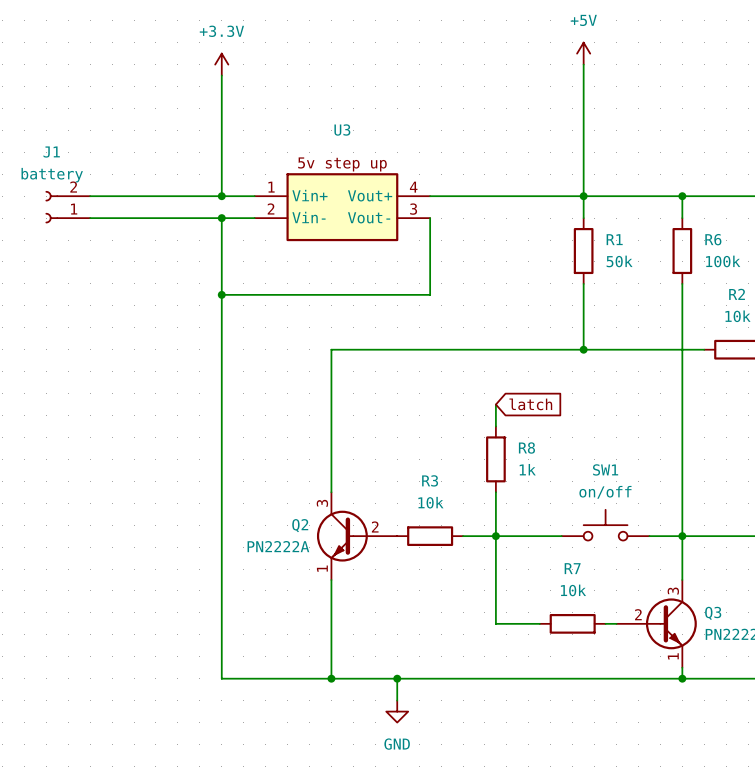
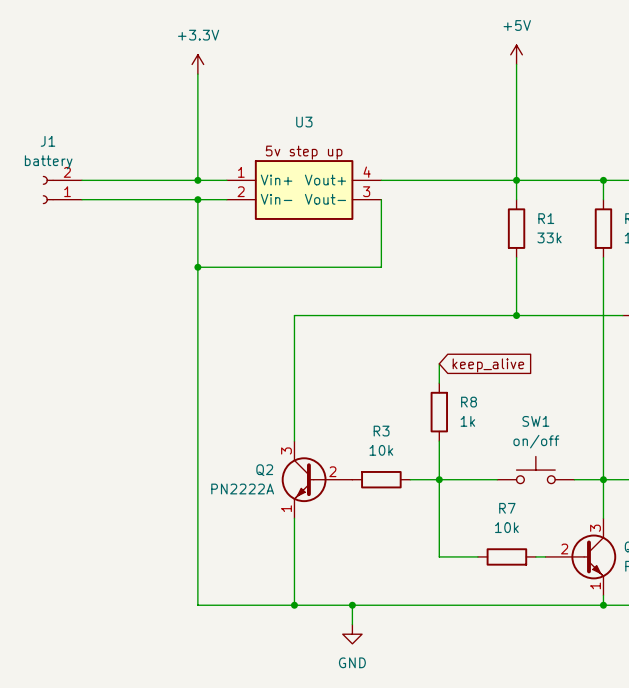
R1 value: 50k (619, 261) -> 33k (549, 237)
global label: latch (530, 404) -> keep_alive (488, 365)

